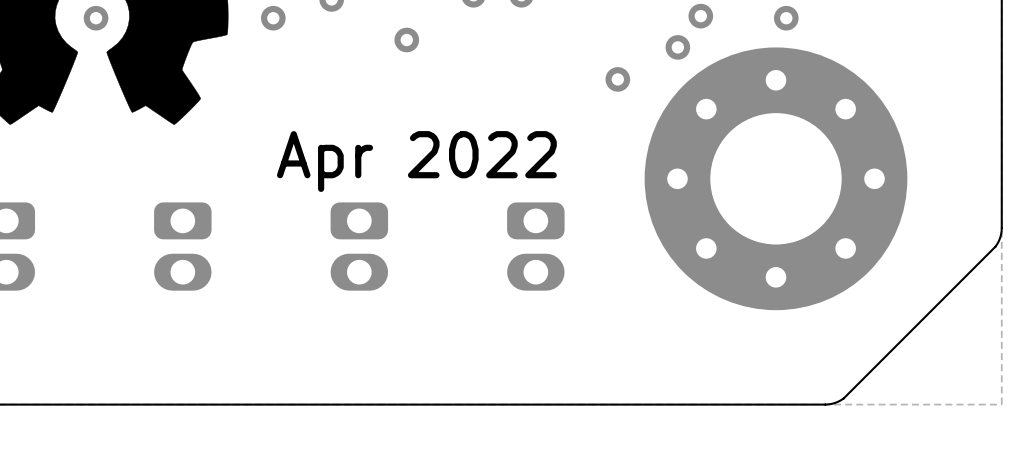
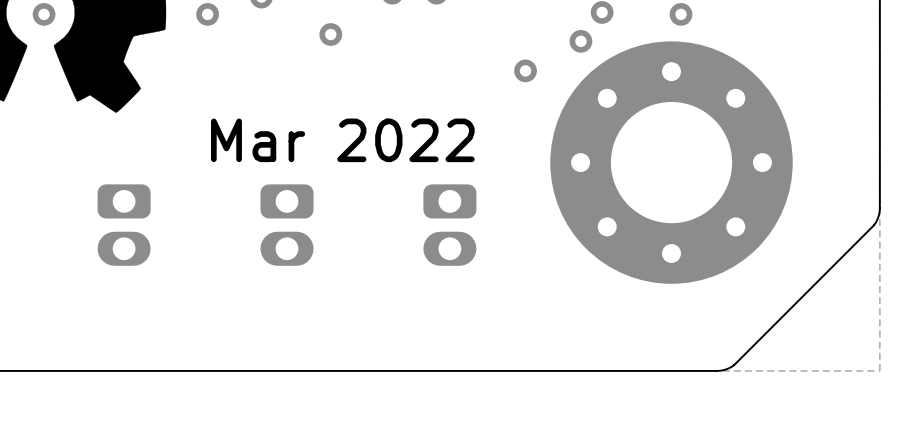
text: Apr 2022 (416, 161) -> Mar 2022 (342, 140)

